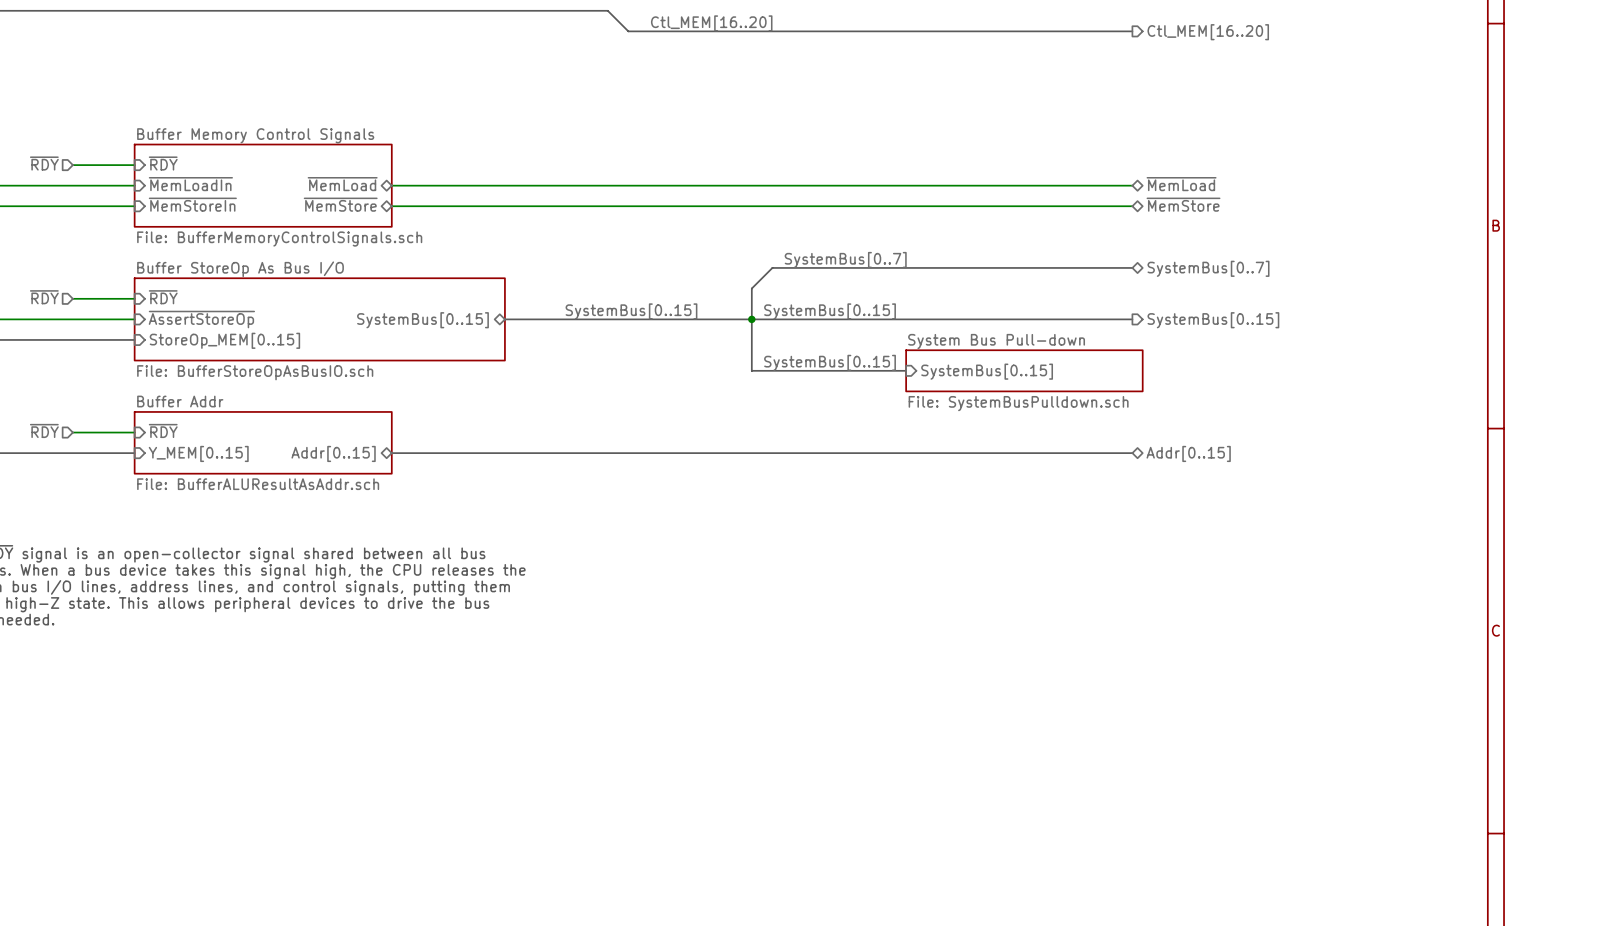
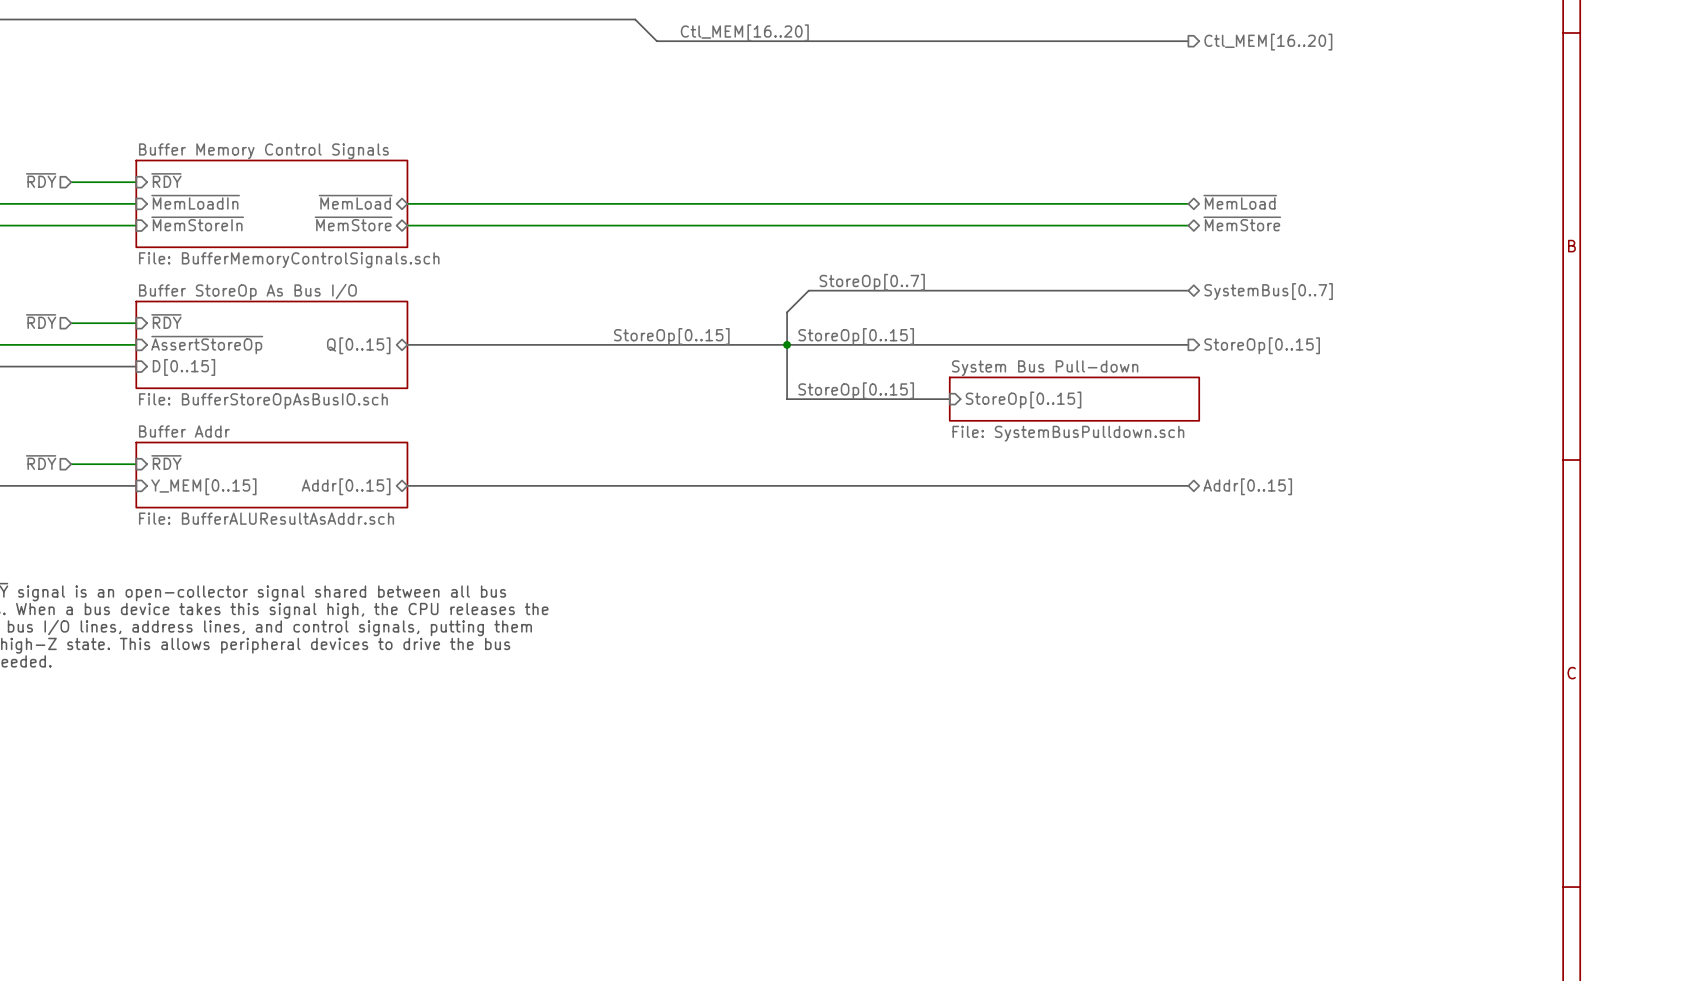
label: SystemBus[0..7] (845, 260) -> StoreOp[0..7] (872, 282)
label: SystemBus[0..15] (631, 311) -> StoreOp[0..15] (671, 336)
label: SystemBus[0..15] (830, 311) -> StoreOp[0..15] (856, 336)
sheet Buffer StoreOp As Bus I/O: none -> File: BufferStoreOpAsBusIO.sch (271, 344)
sheet Buffer StoreOp As Bus I/O: File: BufferStoreOpAsBusIO.sch (319, 319) -> none
bus: none -> (407, 344) (526, 344)
sheet pin: none -> Q[0..15] (358, 345)
sheet pin: SystemBus[0..15] (422, 320) -> none
hierarchical label: SystemBus[0..15] (1213, 320) -> StoreOp[0..15] (1262, 345)
sheet pin: StoreOp_MEM[0..15] (224, 340) -> D[0..15] (183, 367)
label: SystemBus[0..15] (830, 362) -> StoreOp[0..15] (856, 390)
sheet pin: SystemBus[0..15] (987, 371) -> StoreOp[0..15] (1023, 400)

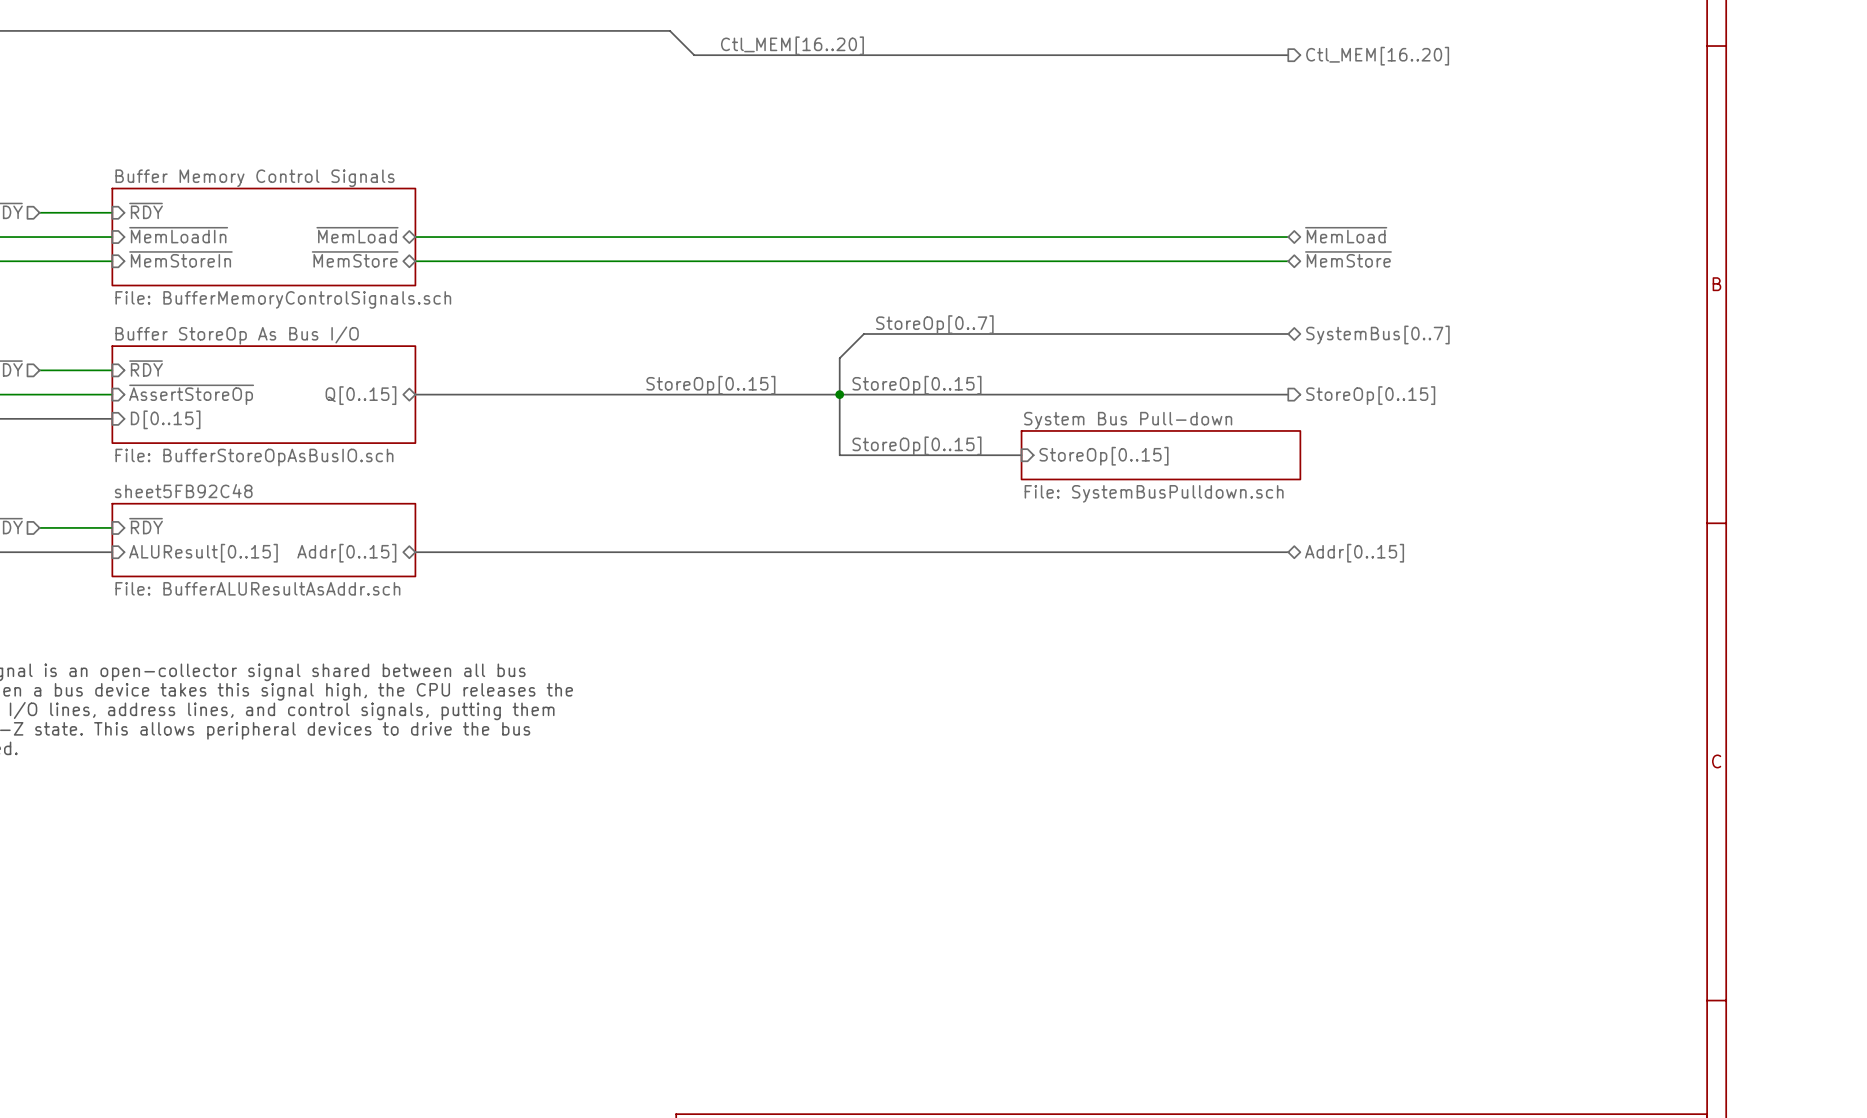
sheet Buffer Addr name: Buffer Addr (184, 431) -> sheet5FB92C48 (183, 491)
sheet pin: Y_MEM[0..15] (203, 486) -> ALUResult[0..15] (203, 553)

